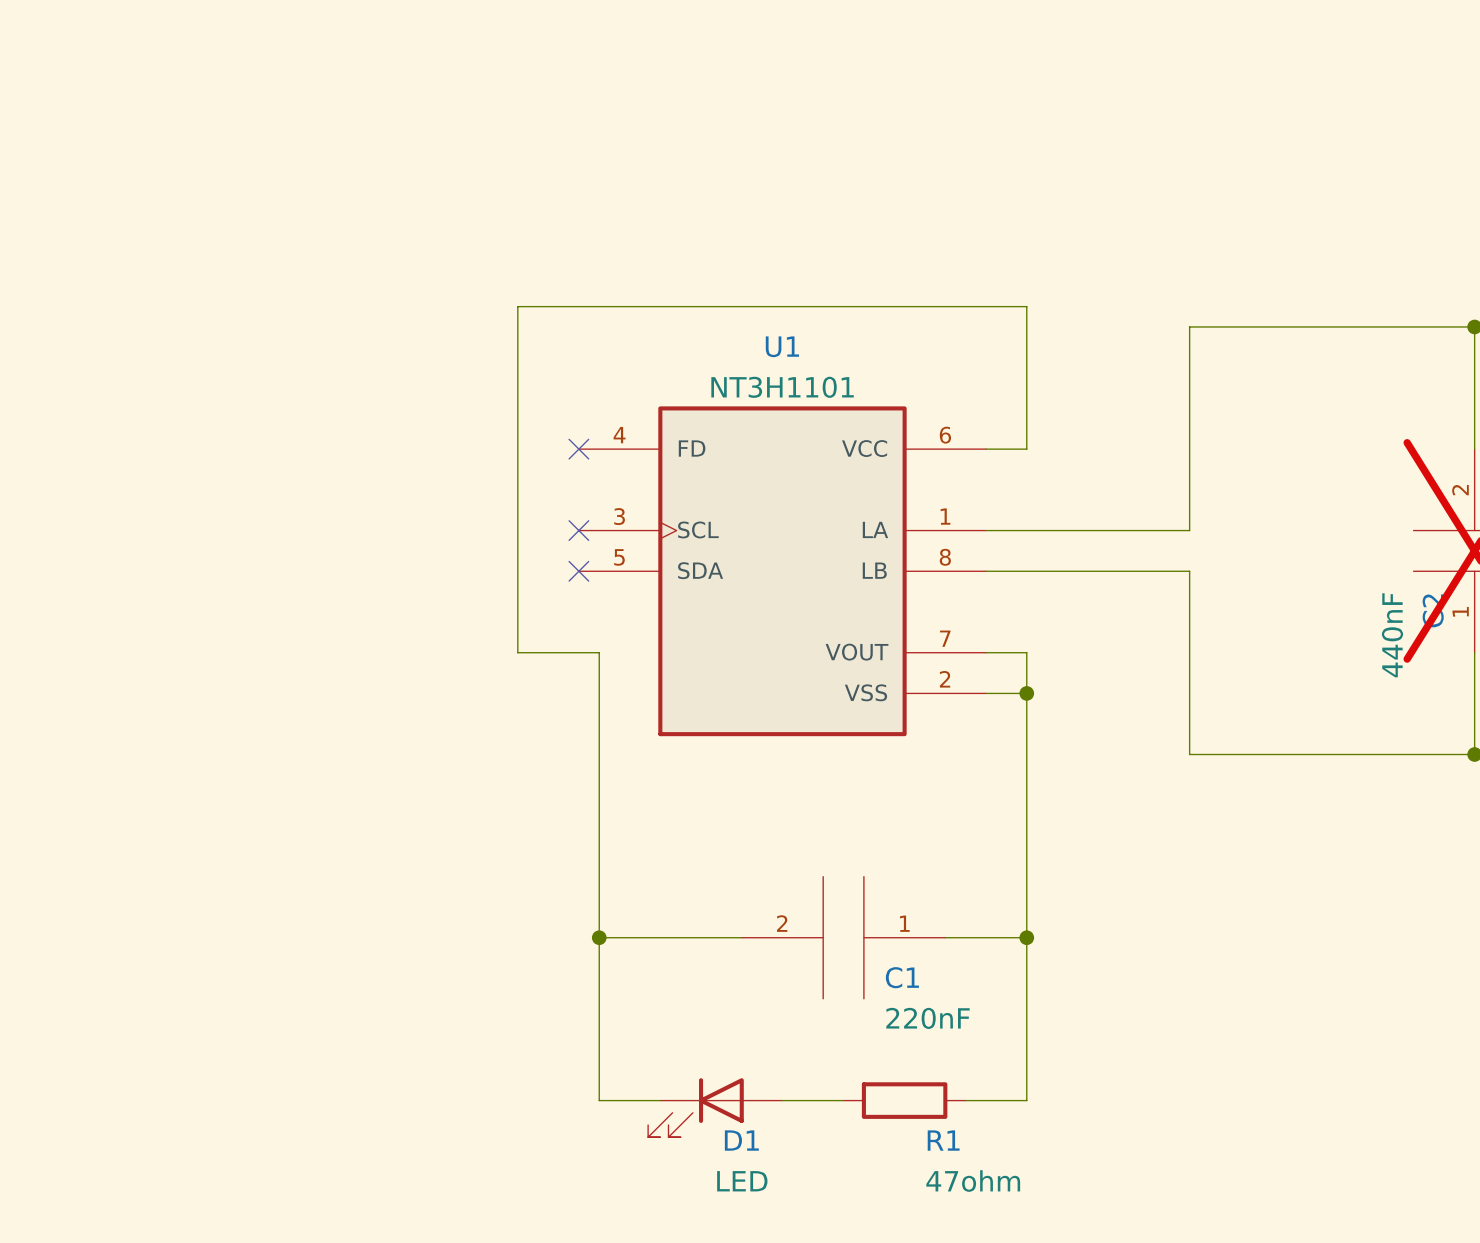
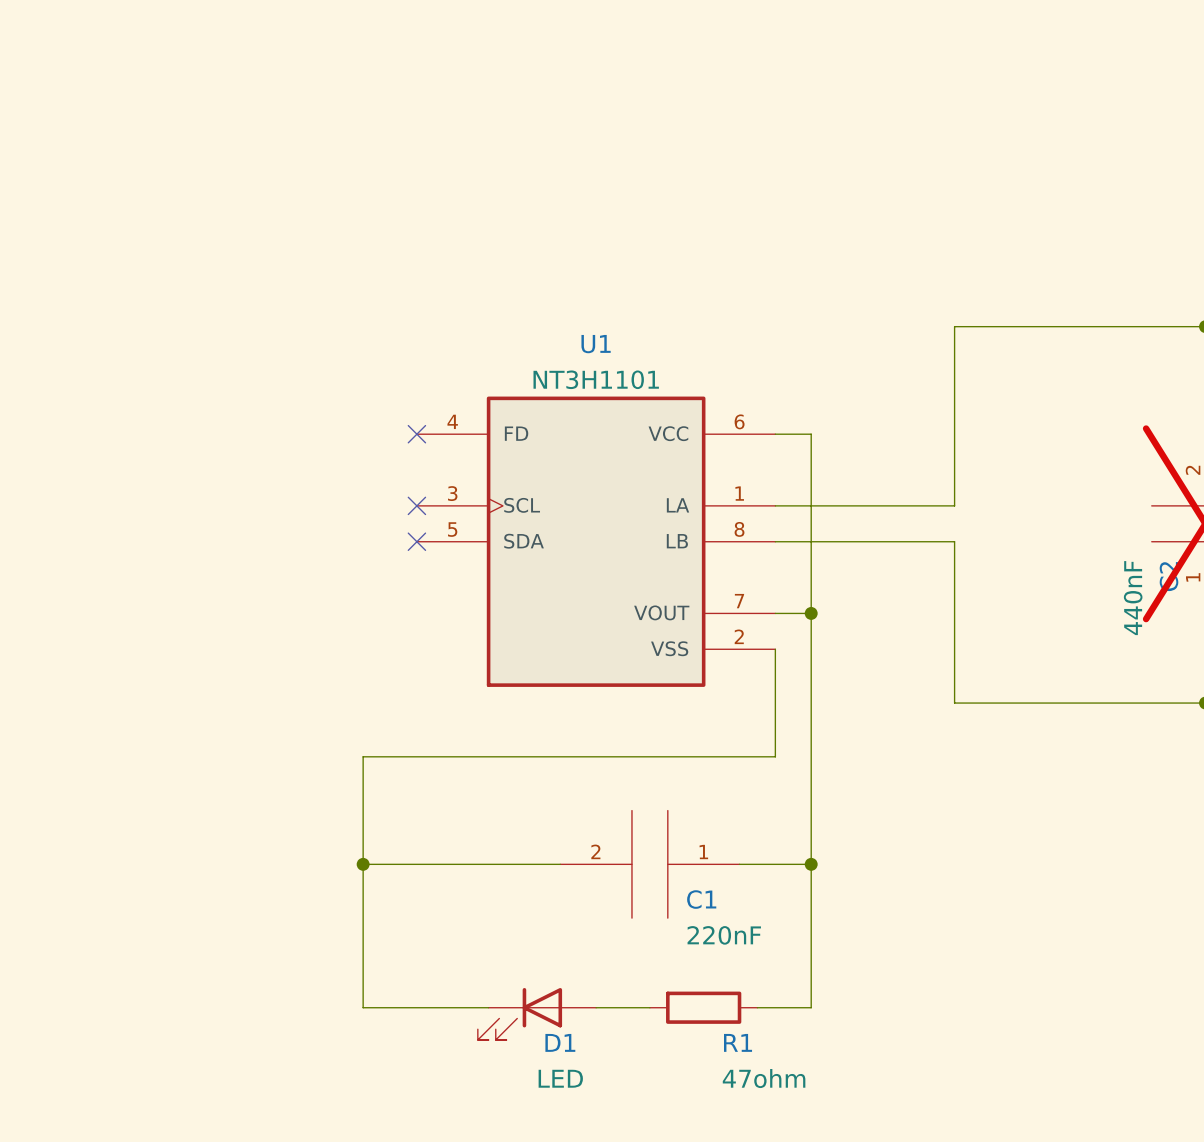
wire: (1026, 449) (1026, 306) (517, 306) (517, 652) (599, 652) (599, 1100) -> (775, 649) (775, 756) (363, 756) (363, 1007) (434, 1007)
wire: none -> (811, 434) (811, 613)
wire: (986, 693) (1026, 693) -> none
junction position: (1026, 693) -> (811, 613)
wire: none -> (363, 864) (434, 864)
junction position: (599, 937) -> (363, 864)

